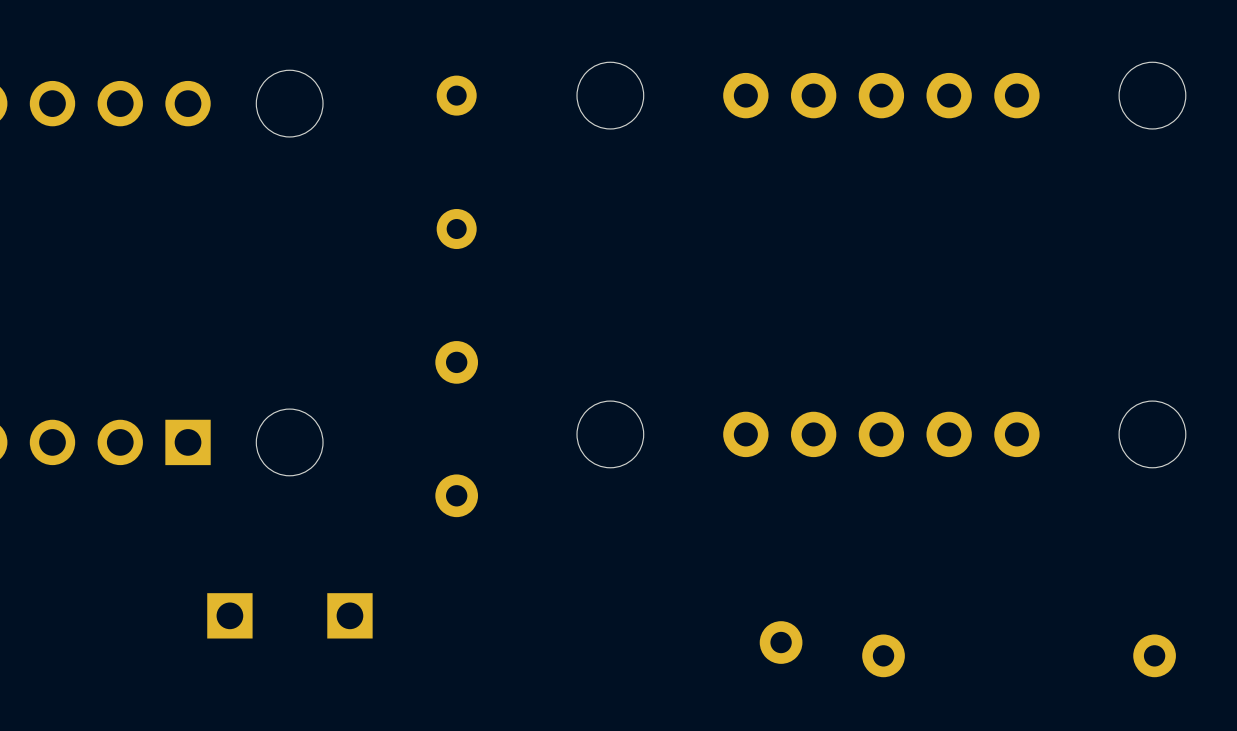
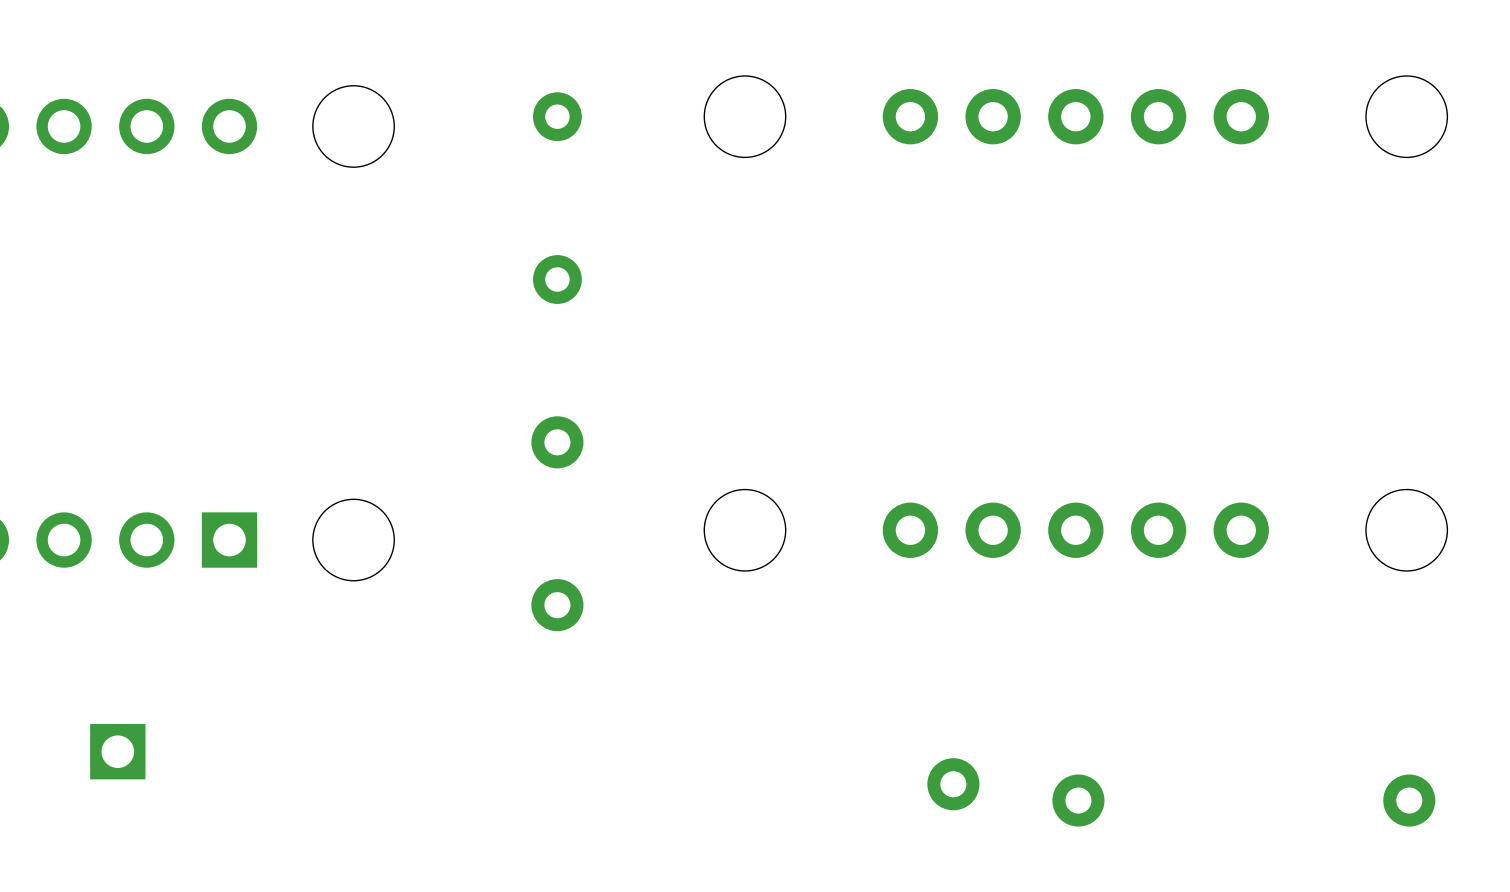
part: none -> (117, 751)
part: (229, 615) -> none
part: (349, 615) -> none

